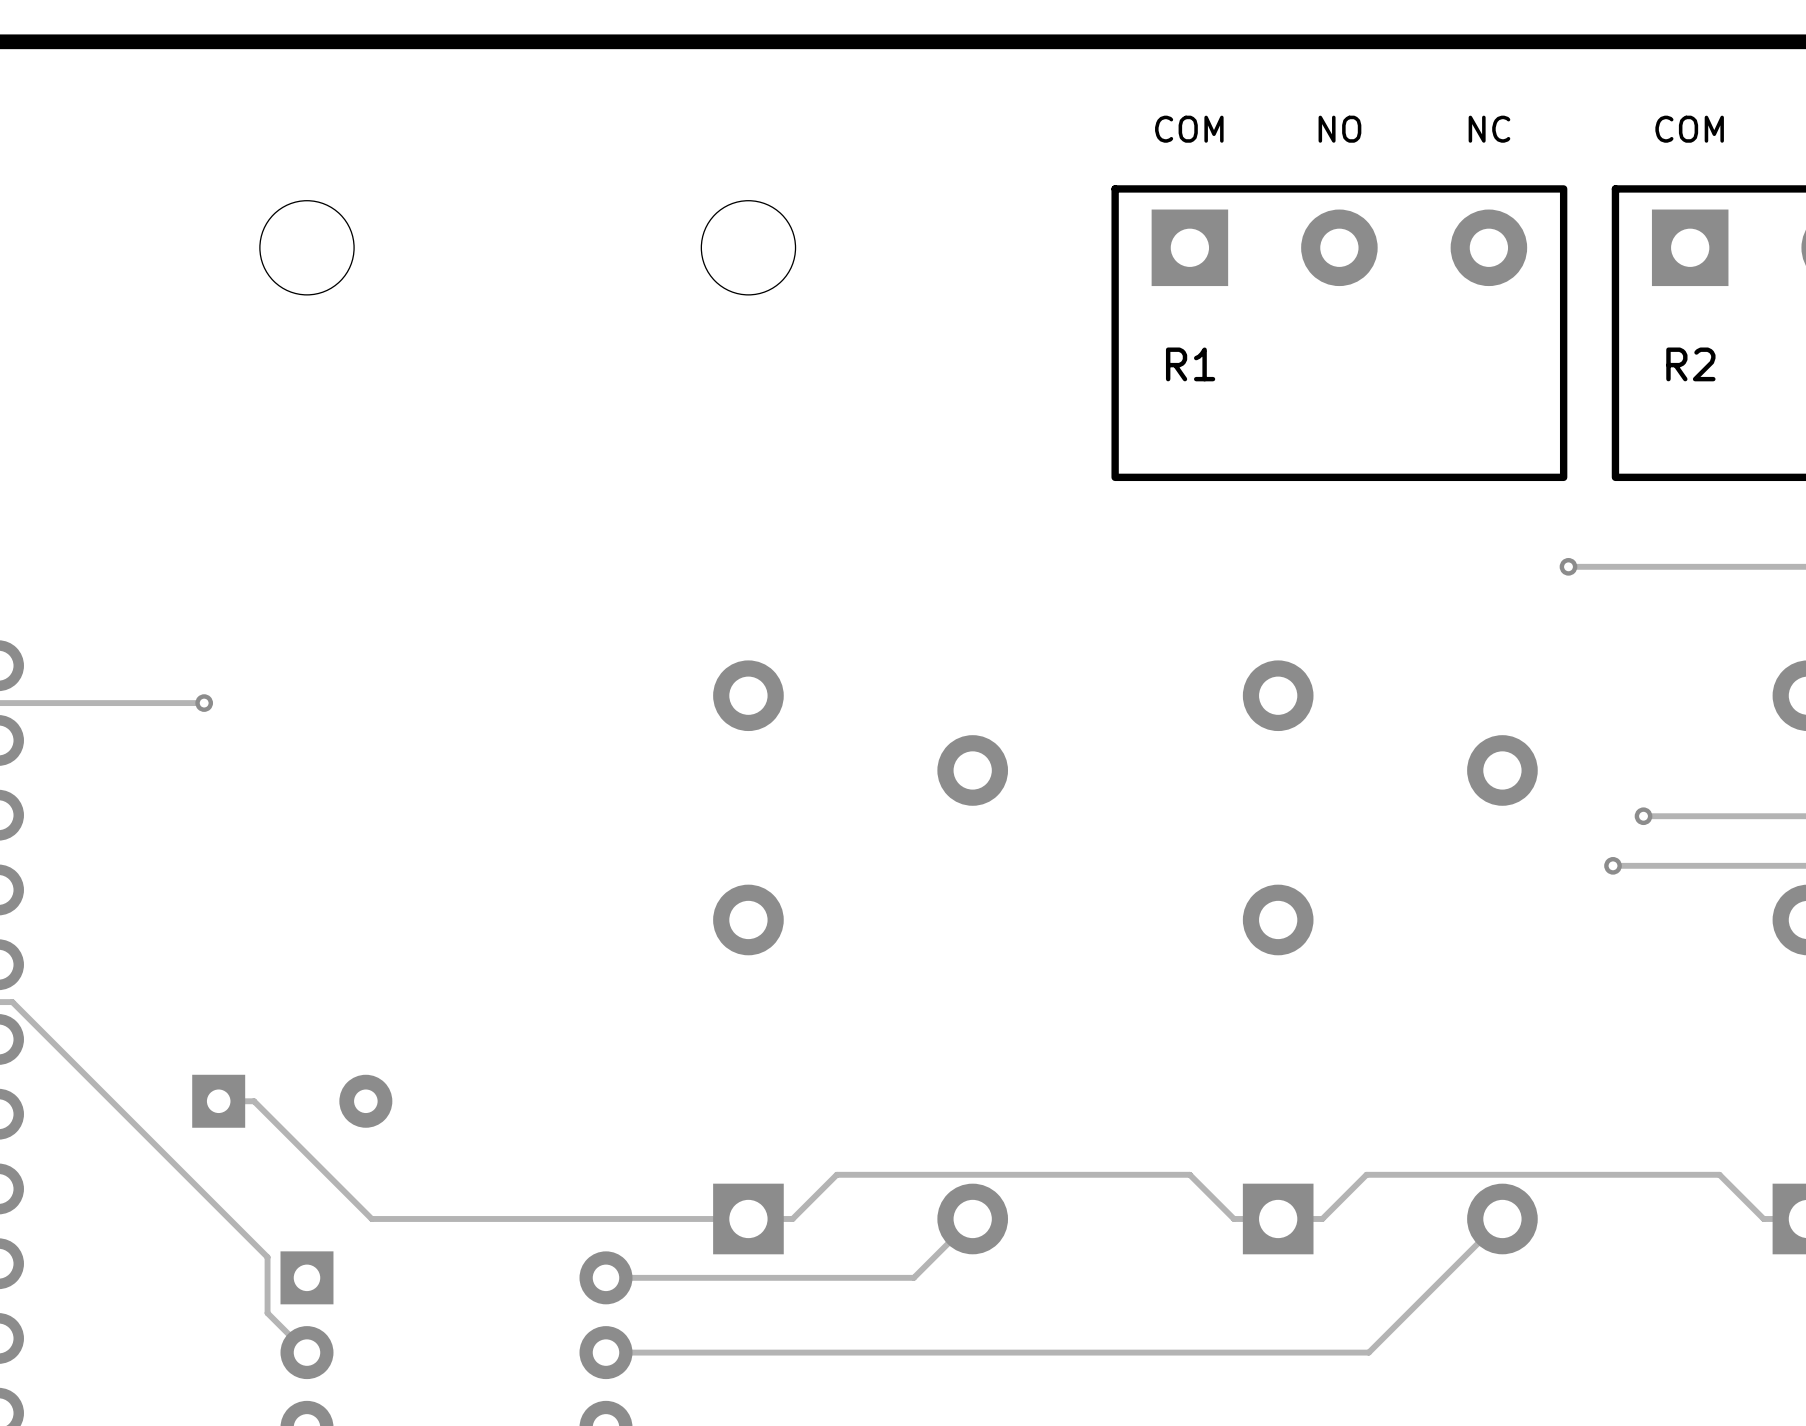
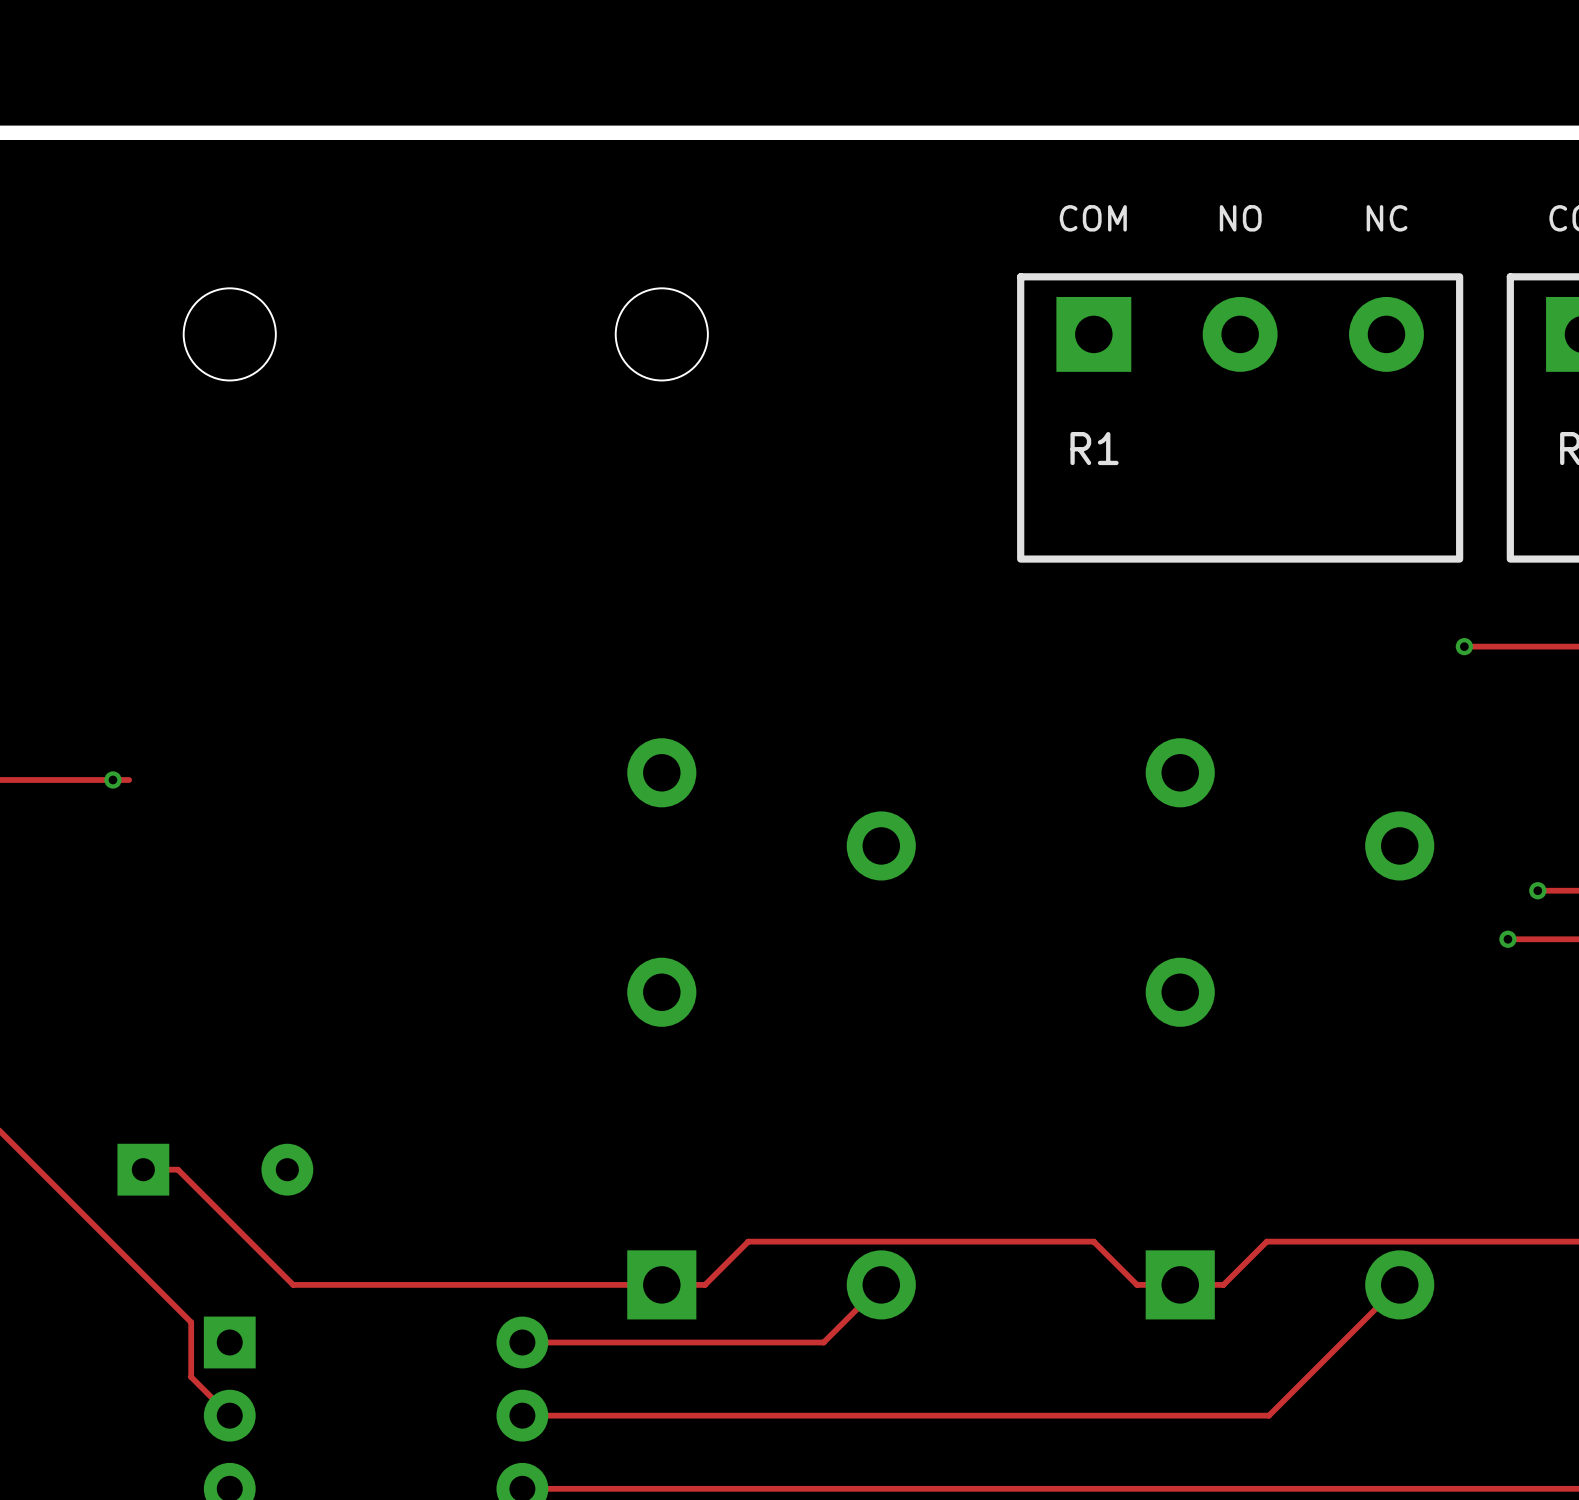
via position: (204, 703) -> (112, 779)

